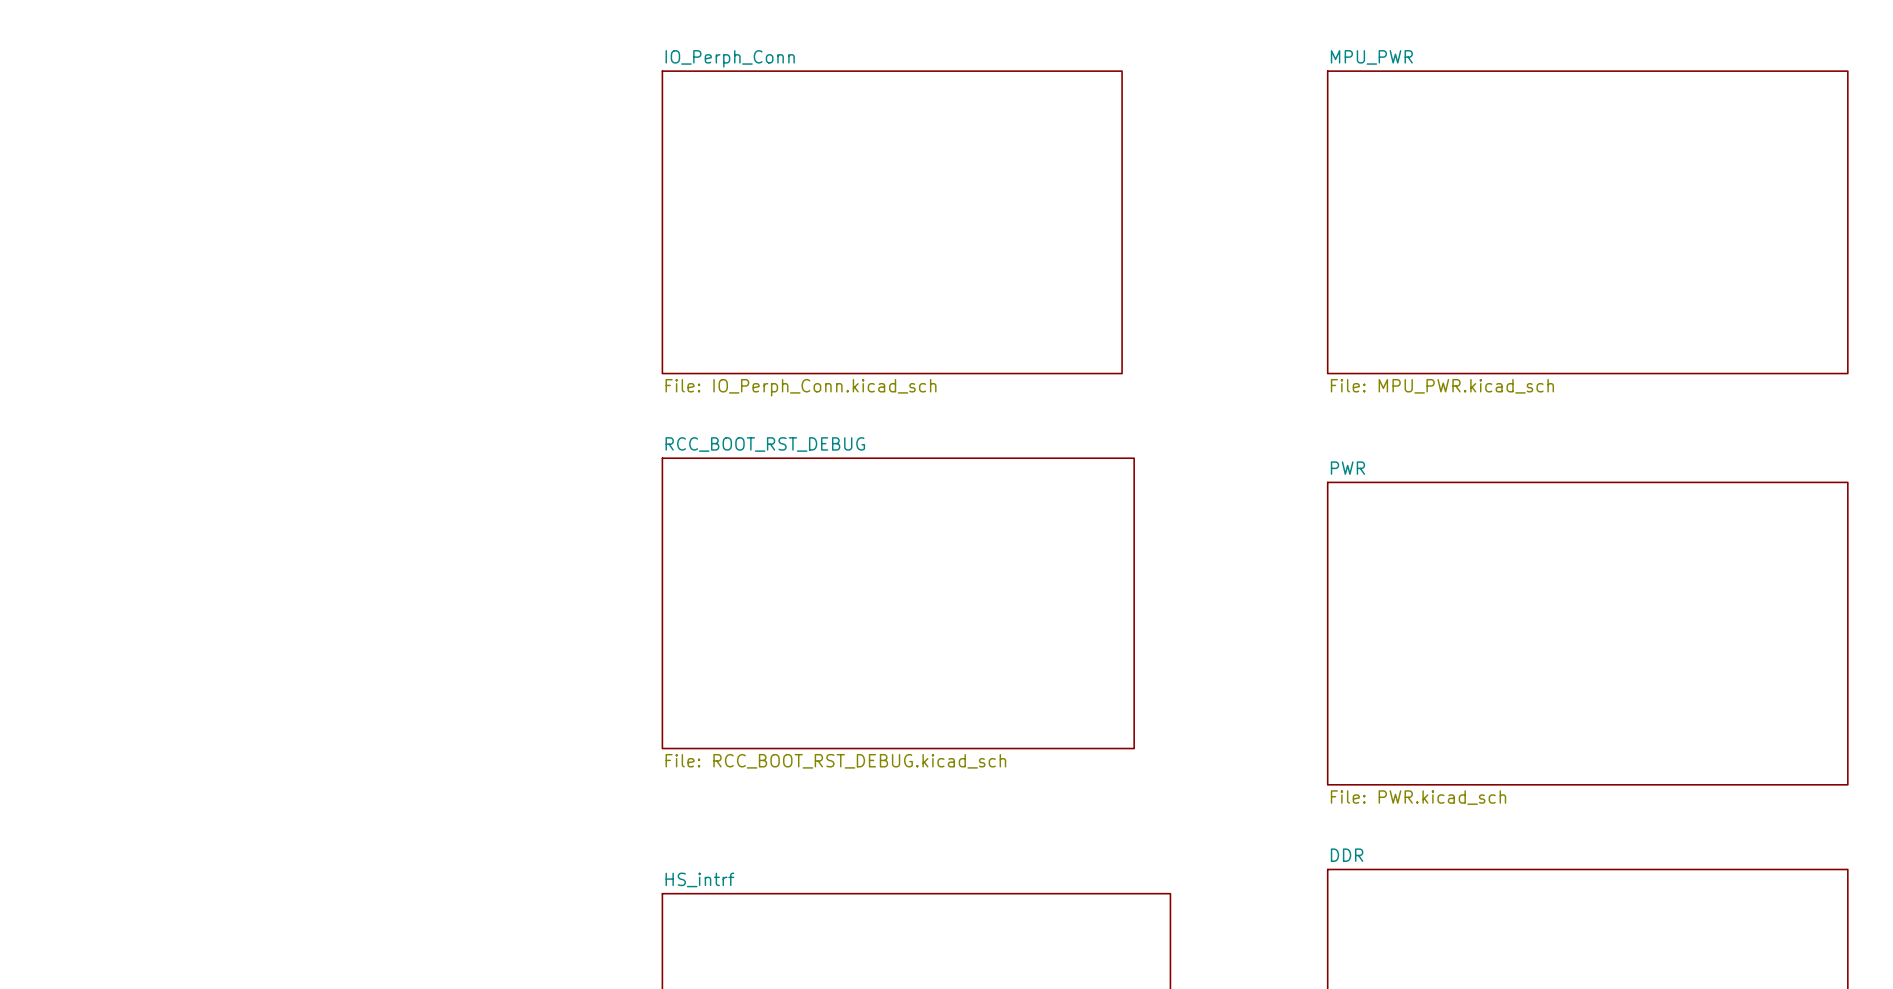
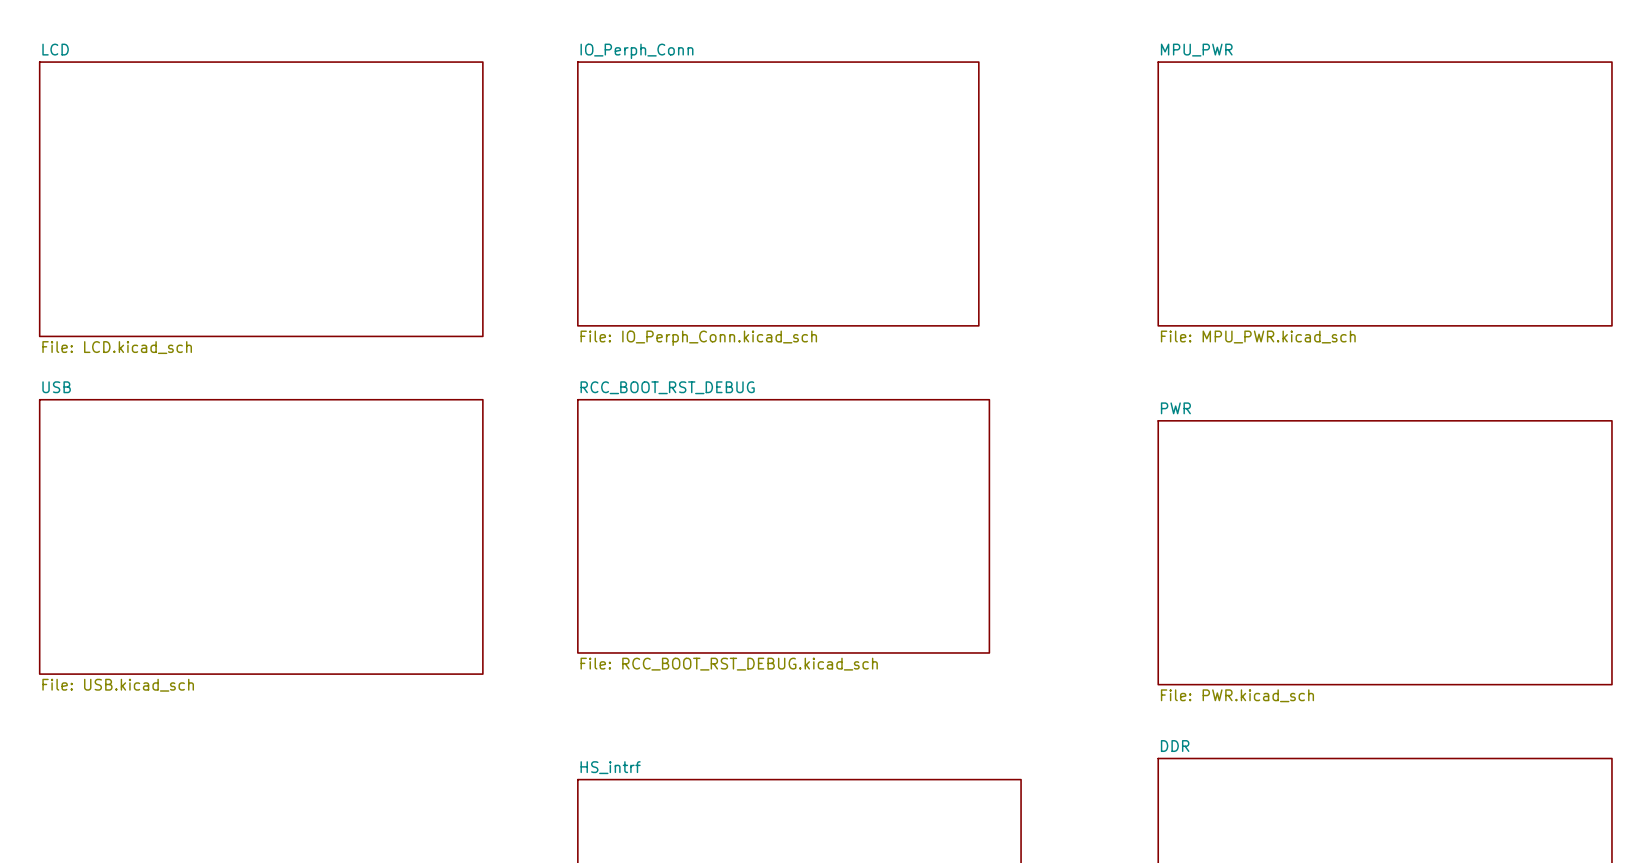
sheet LCD: none -> File: LCD.kicad_sch (261, 199)
sheet USB: none -> File: USB.kicad_sch (261, 536)

